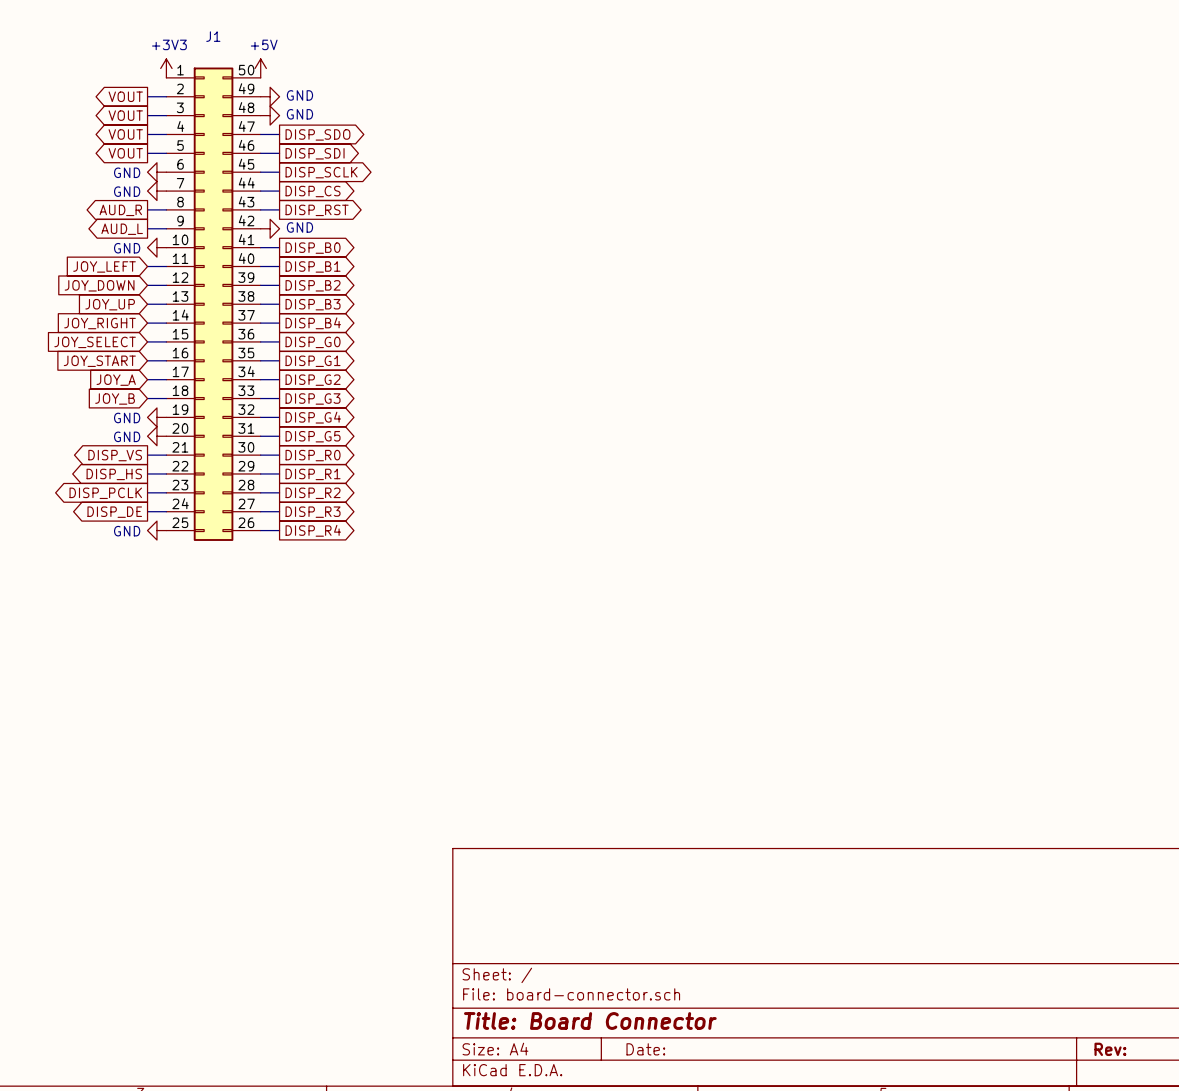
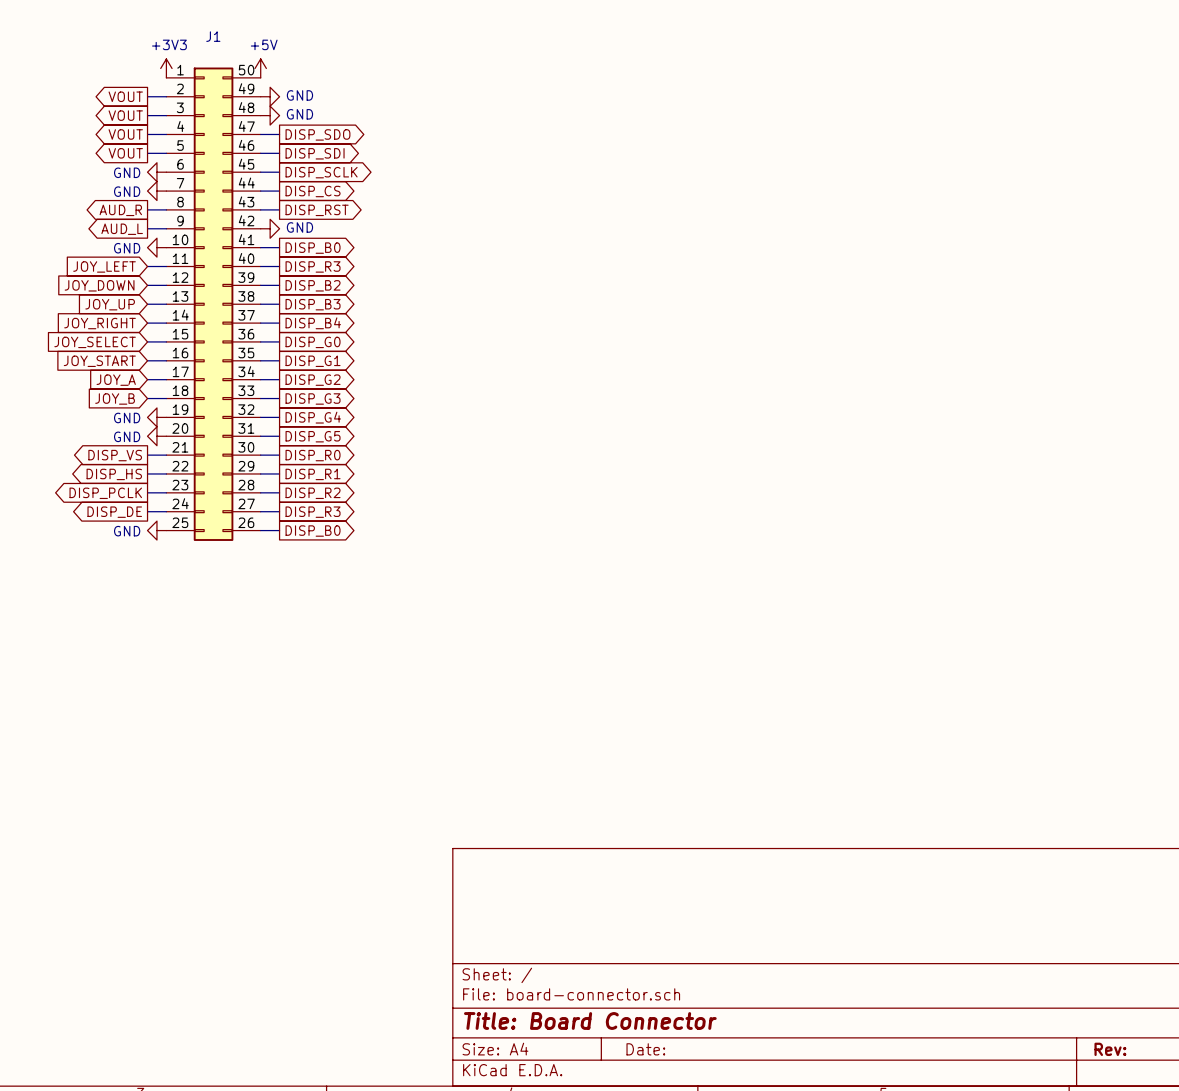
global label: DISP_B1 (313, 266) -> DISP_R3 (313, 266)
global label: DISP_R4 (313, 530) -> DISP_B0 (313, 531)

